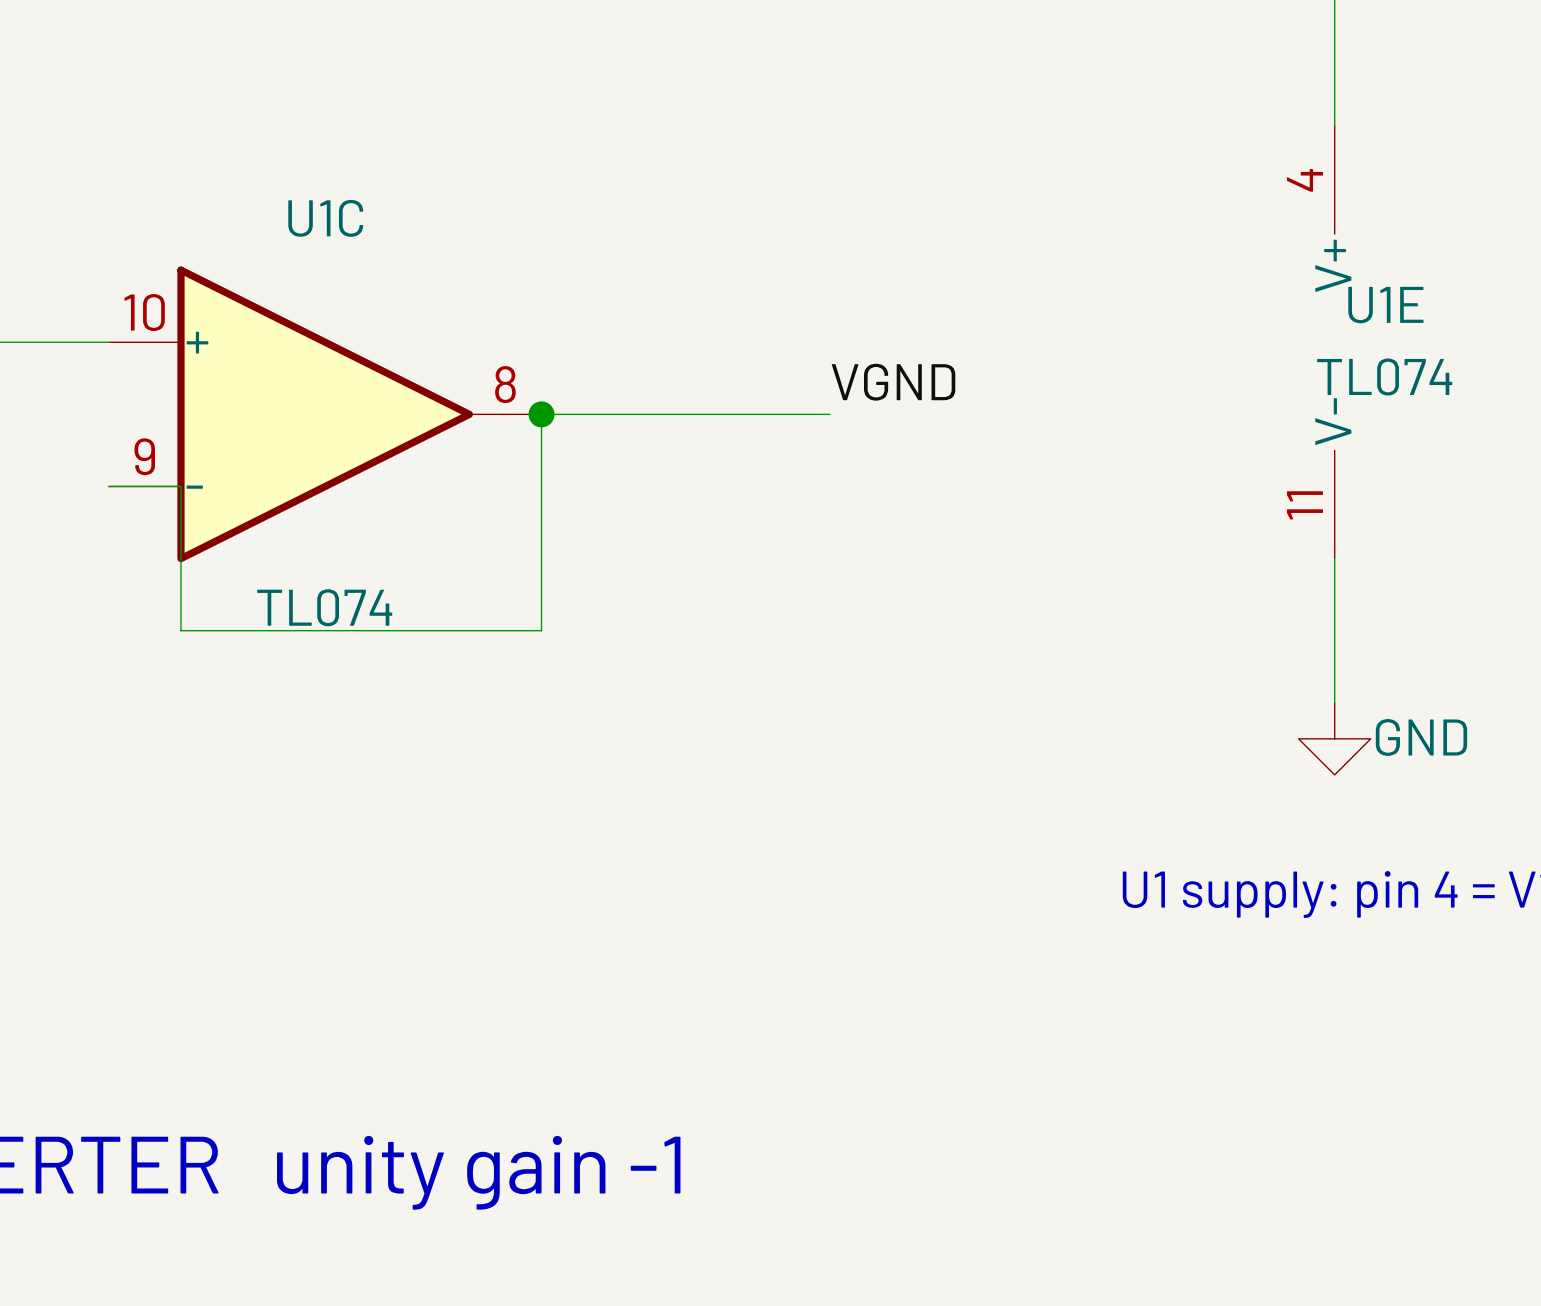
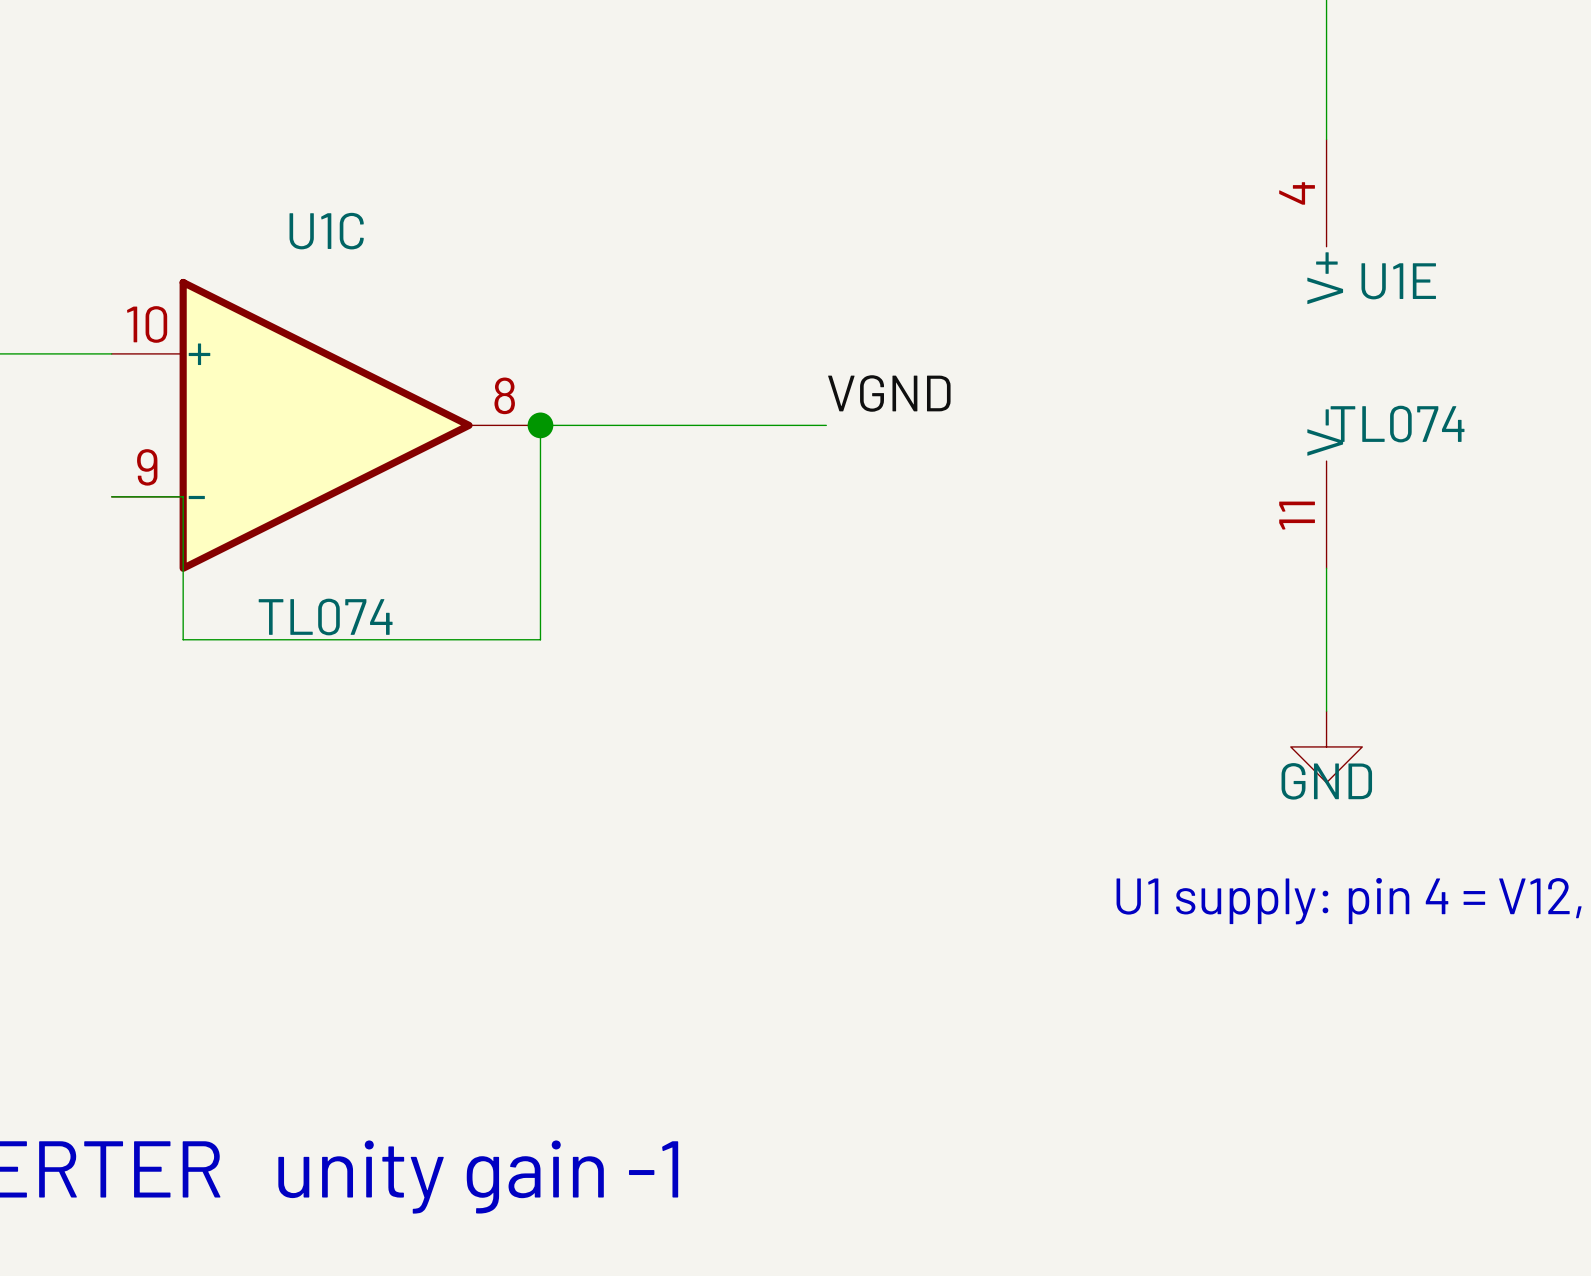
U1E name position: U1E (1385, 305) -> U1E (1398, 281)
U1E value position: TL074 (1384, 376) -> TL074 (1397, 424)
power symbol text position: GND (1421, 737) -> GND (1326, 781)

